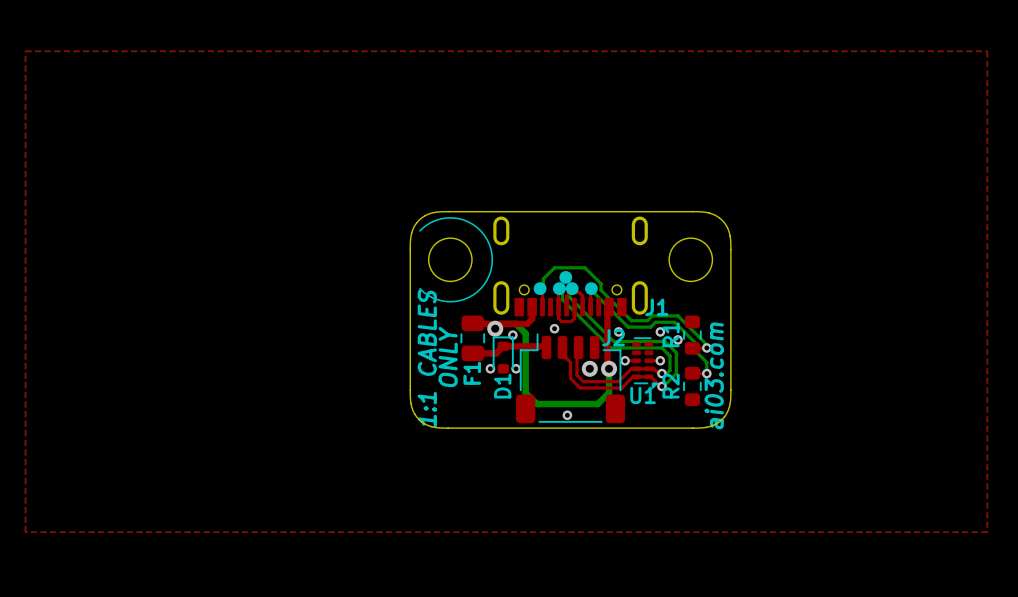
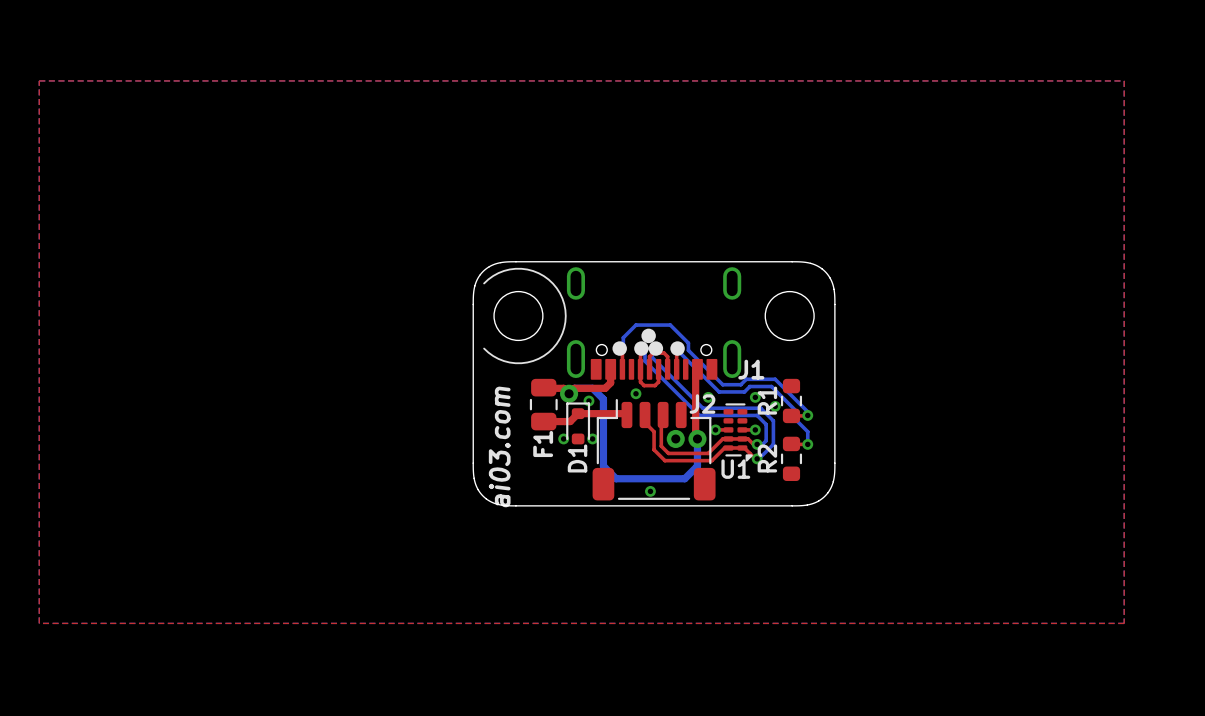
text: ONLY (448, 357) -> none
text: 1:1 CABLES (427, 358) -> none
text position: ai03.com (714, 375) -> ai03.com (499, 446)

